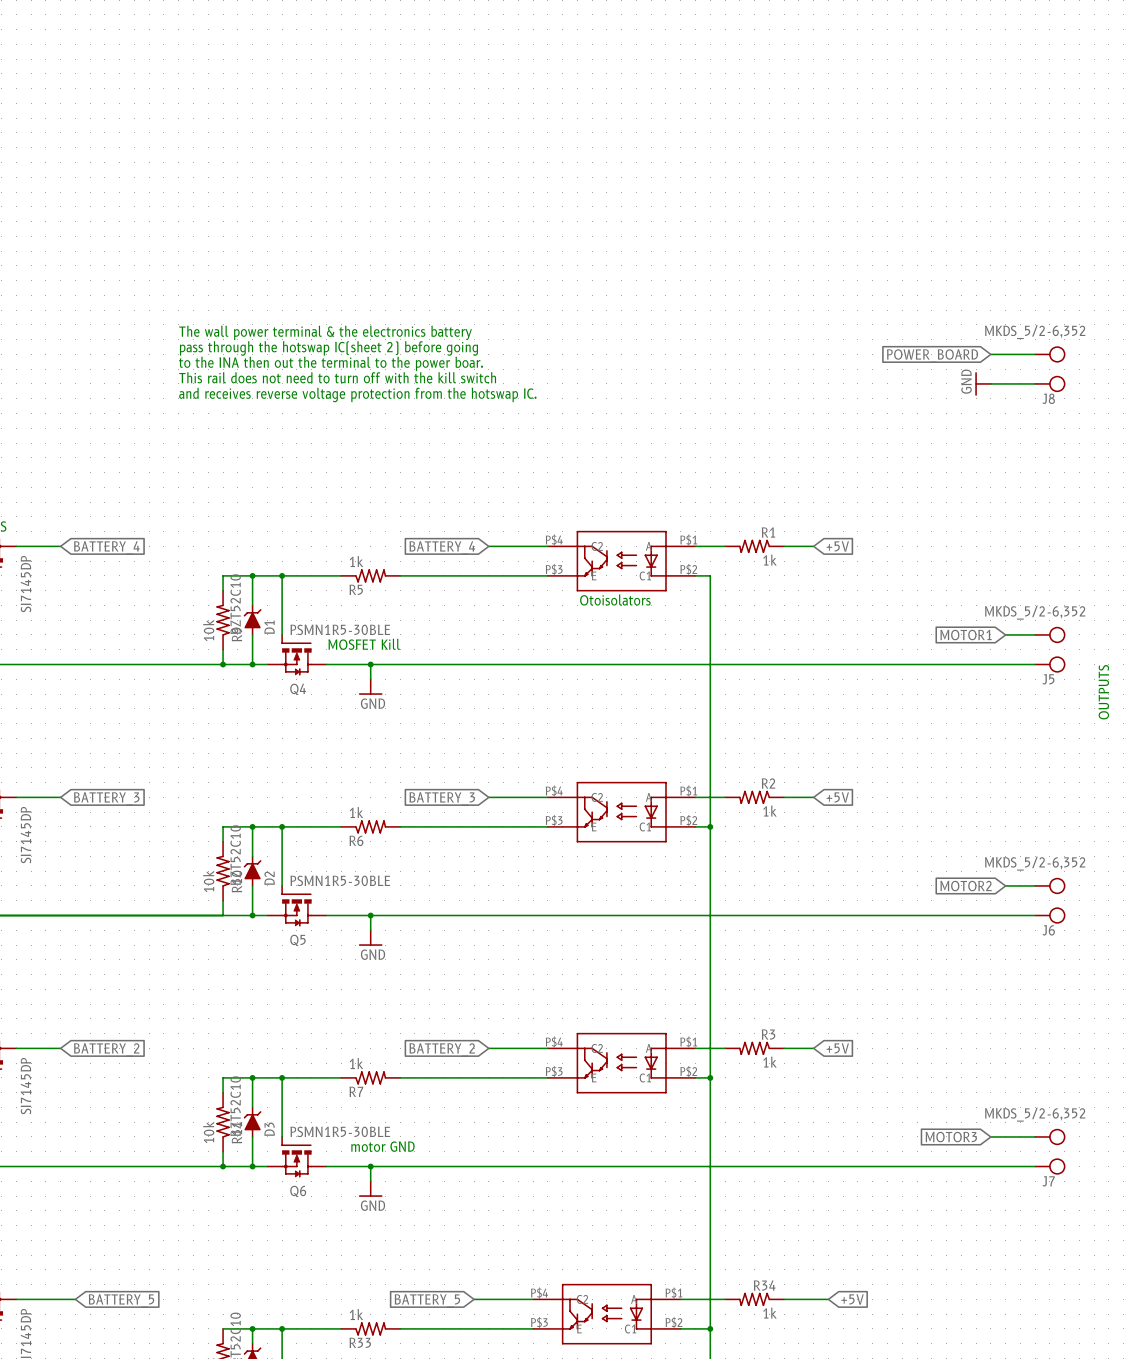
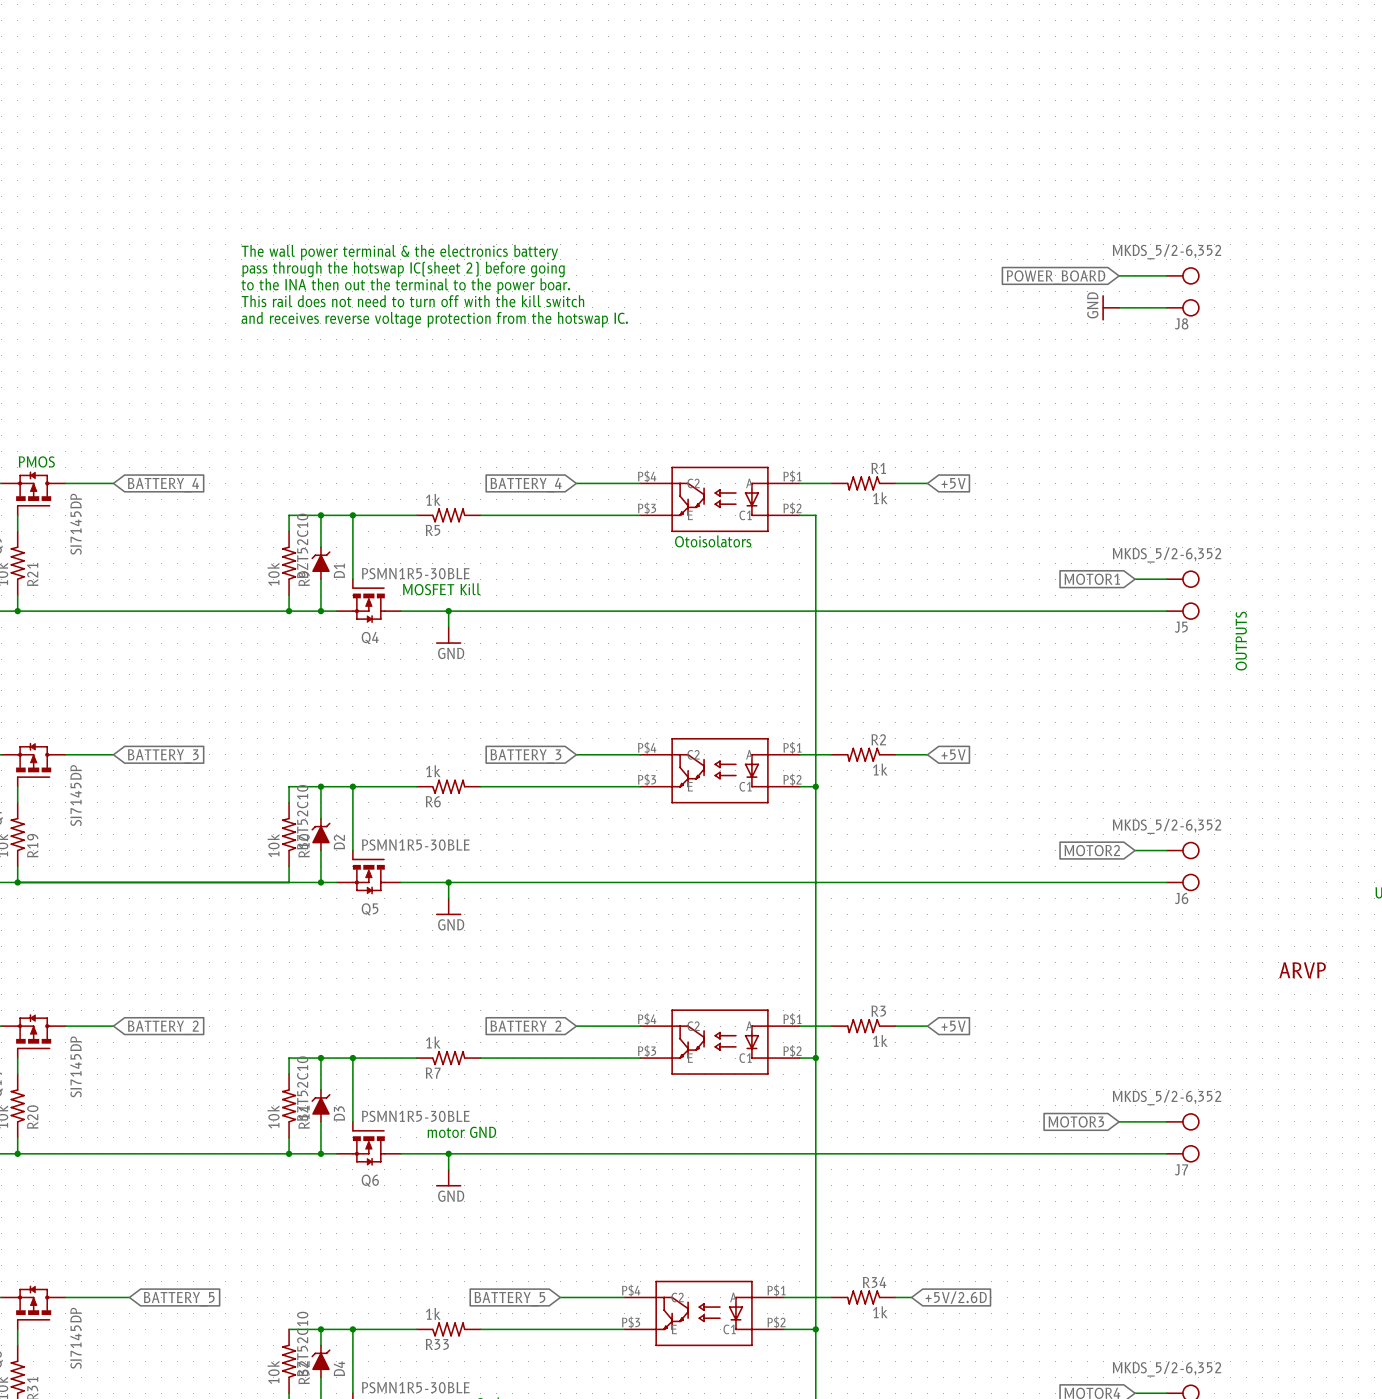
wire: (798, 1299) (828, 1299) -> none
global label: none -> +5V/2.6D (956, 1297)
global label: +5V (852, 1299) -> none

